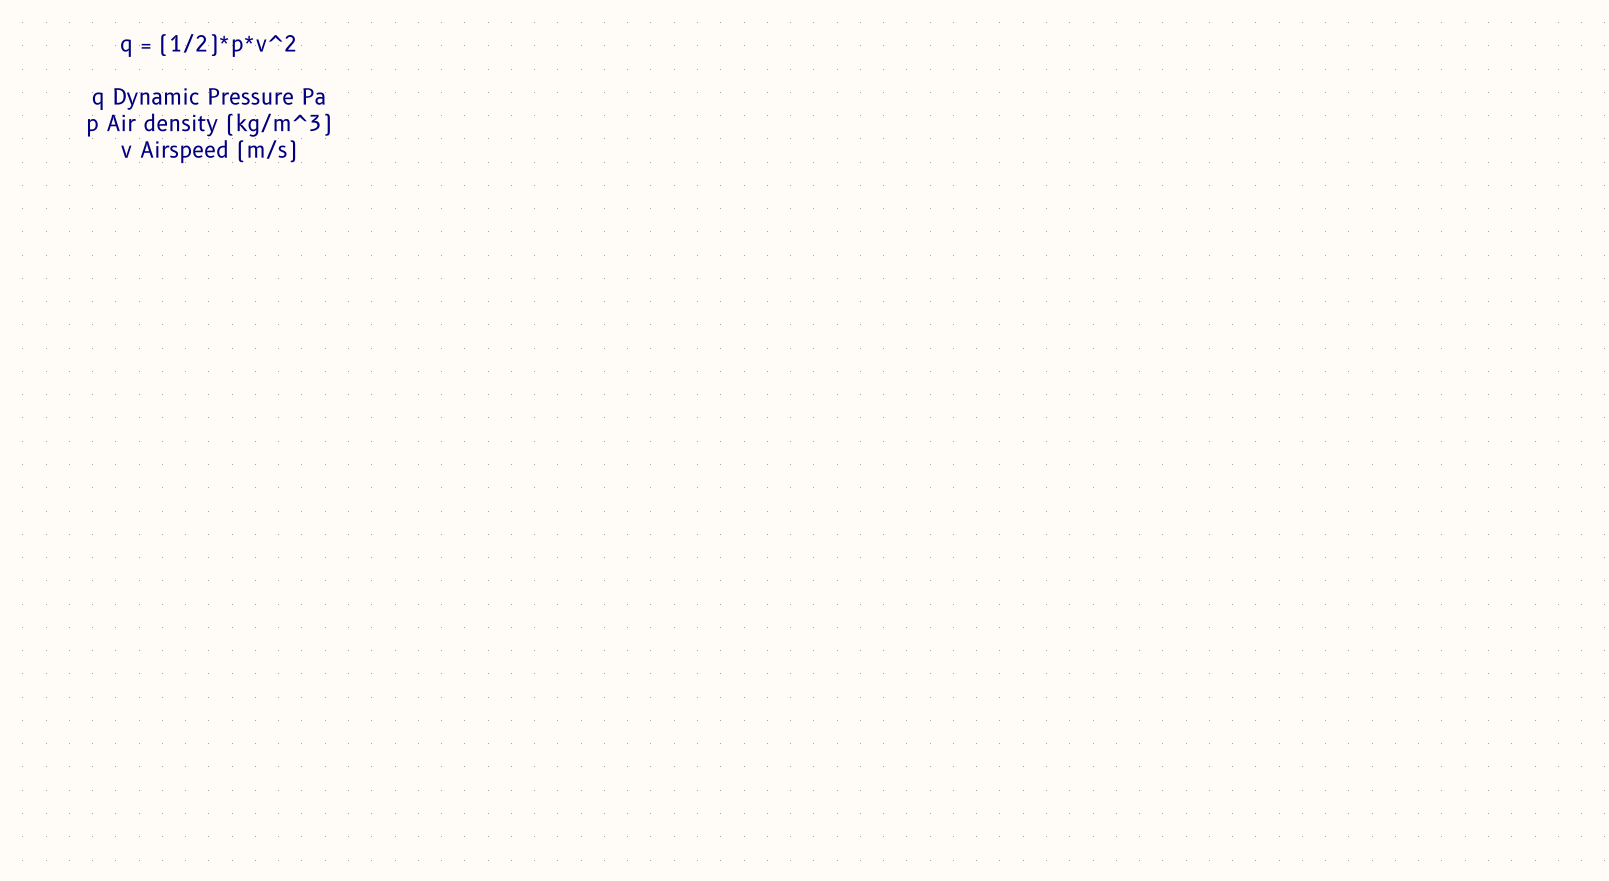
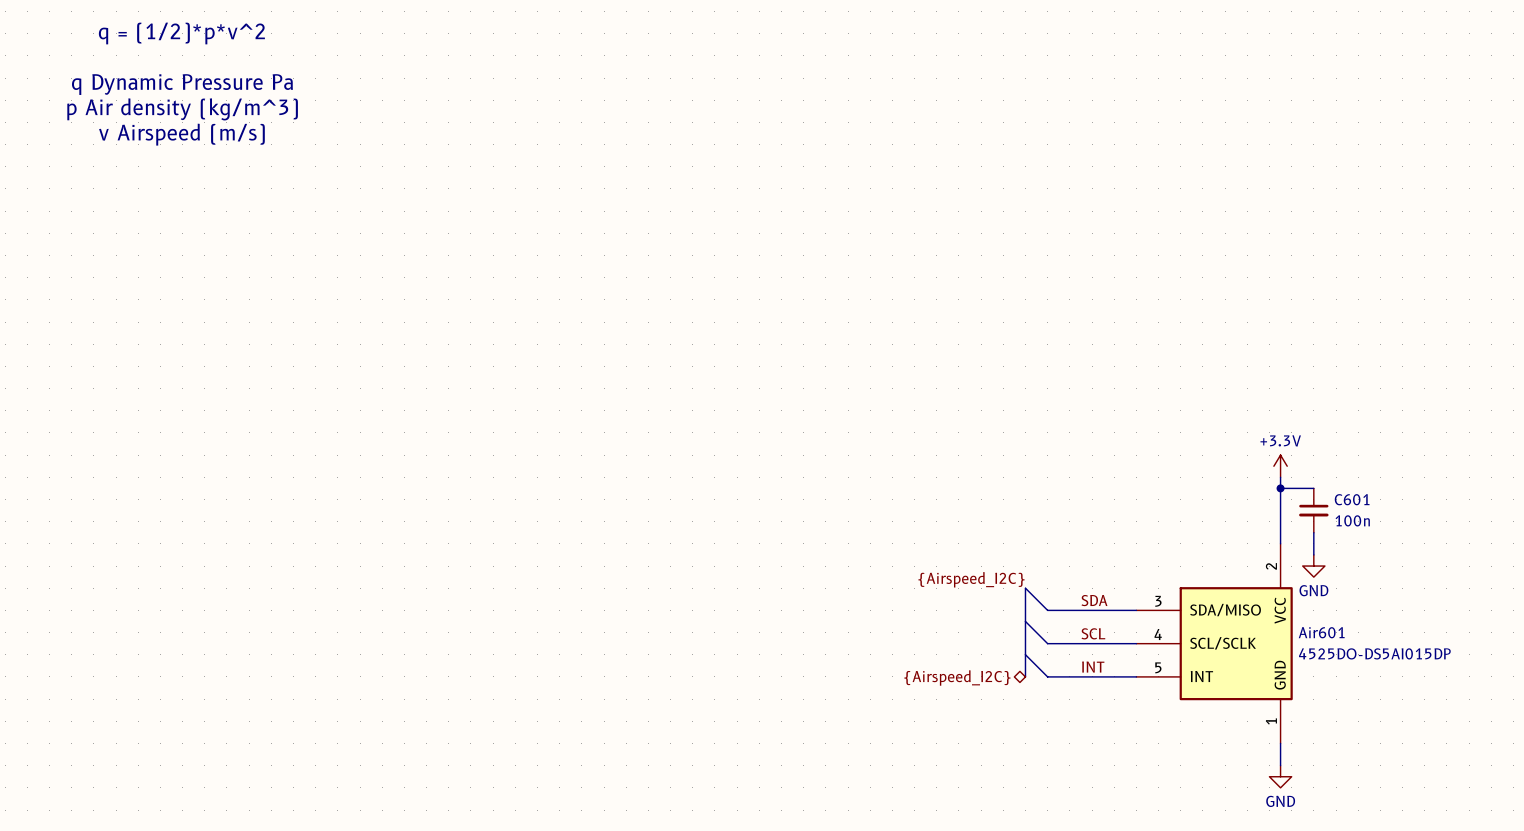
power symbol: none -> +3.3V (1280, 466)
wire: none -> (1280, 477) (1280, 543)
wire: none -> (1280, 488) (1313, 488)
junction: none -> (1280, 488)
C601: none -> 100n (1313, 510)
wire: none -> (1313, 532) (1313, 554)
power symbol: none -> GND (1313, 566)
label: none -> {Airspeed_I2C} (971, 579)
wire: none -> (1025, 588) (1047, 610) (1136, 610)
bus: none -> (1025, 588) (1025, 676)
label: none -> SDA (1094, 600)
wire: none -> (1025, 621) (1047, 643) (1136, 643)
label: none -> SCL (1093, 633)
Air601: none -> 4525DO-DS5AI015DP (1214, 643)
wire: none -> (1025, 654) (1047, 676) (1136, 676)
label: none -> INT (1093, 667)
hierarchical label: none -> {Airspeed_I2C} (957, 677)
wire: none -> (1280, 743) (1280, 765)
power symbol: none -> GND (1280, 776)

